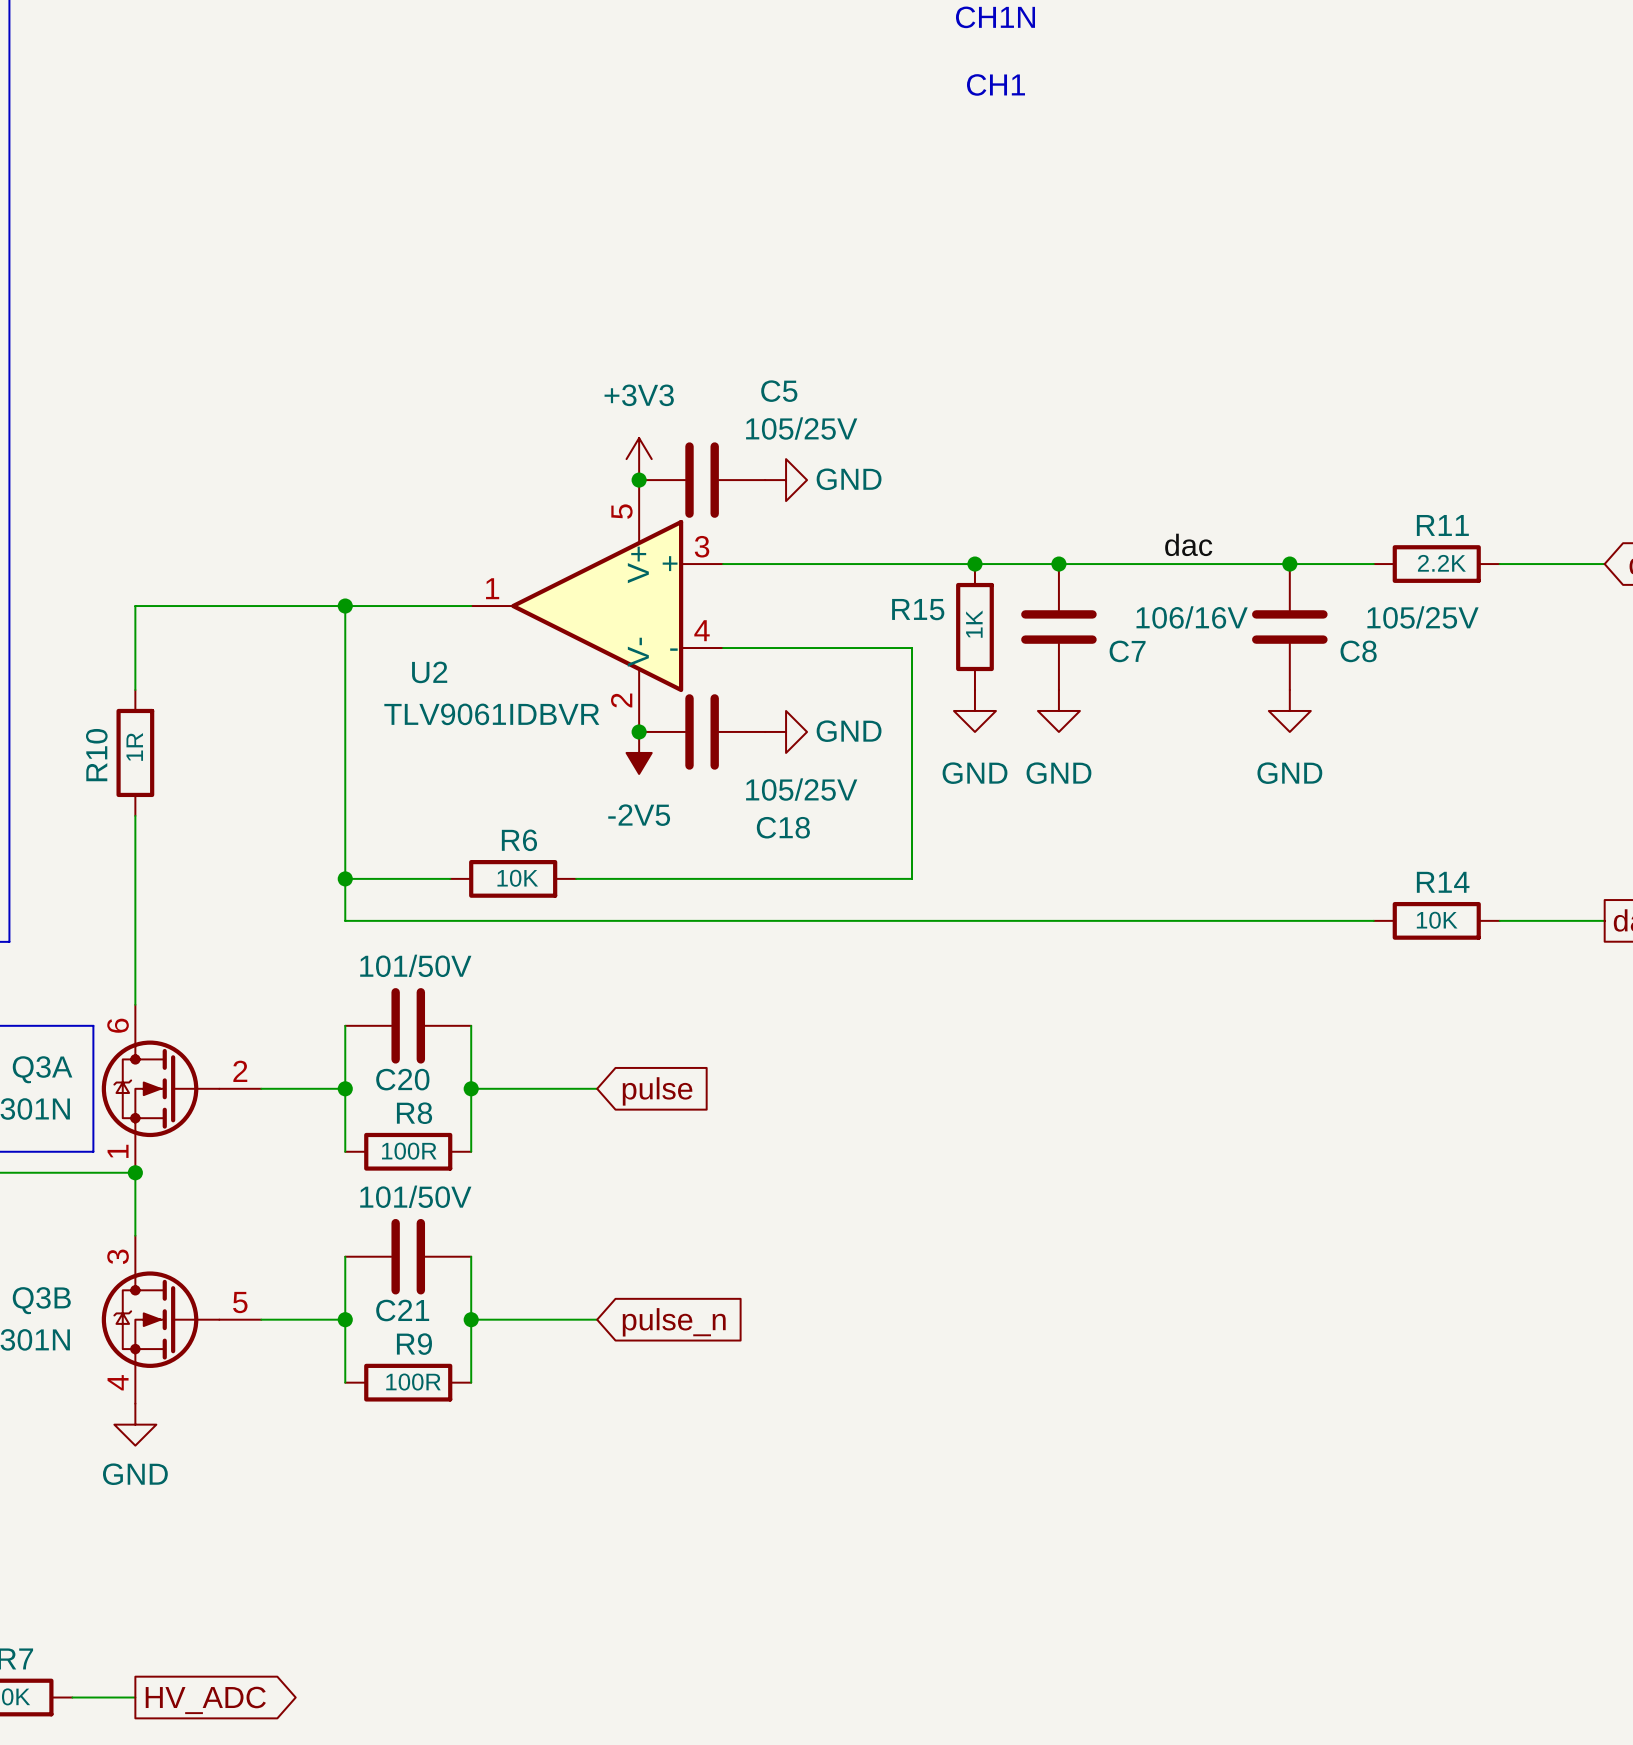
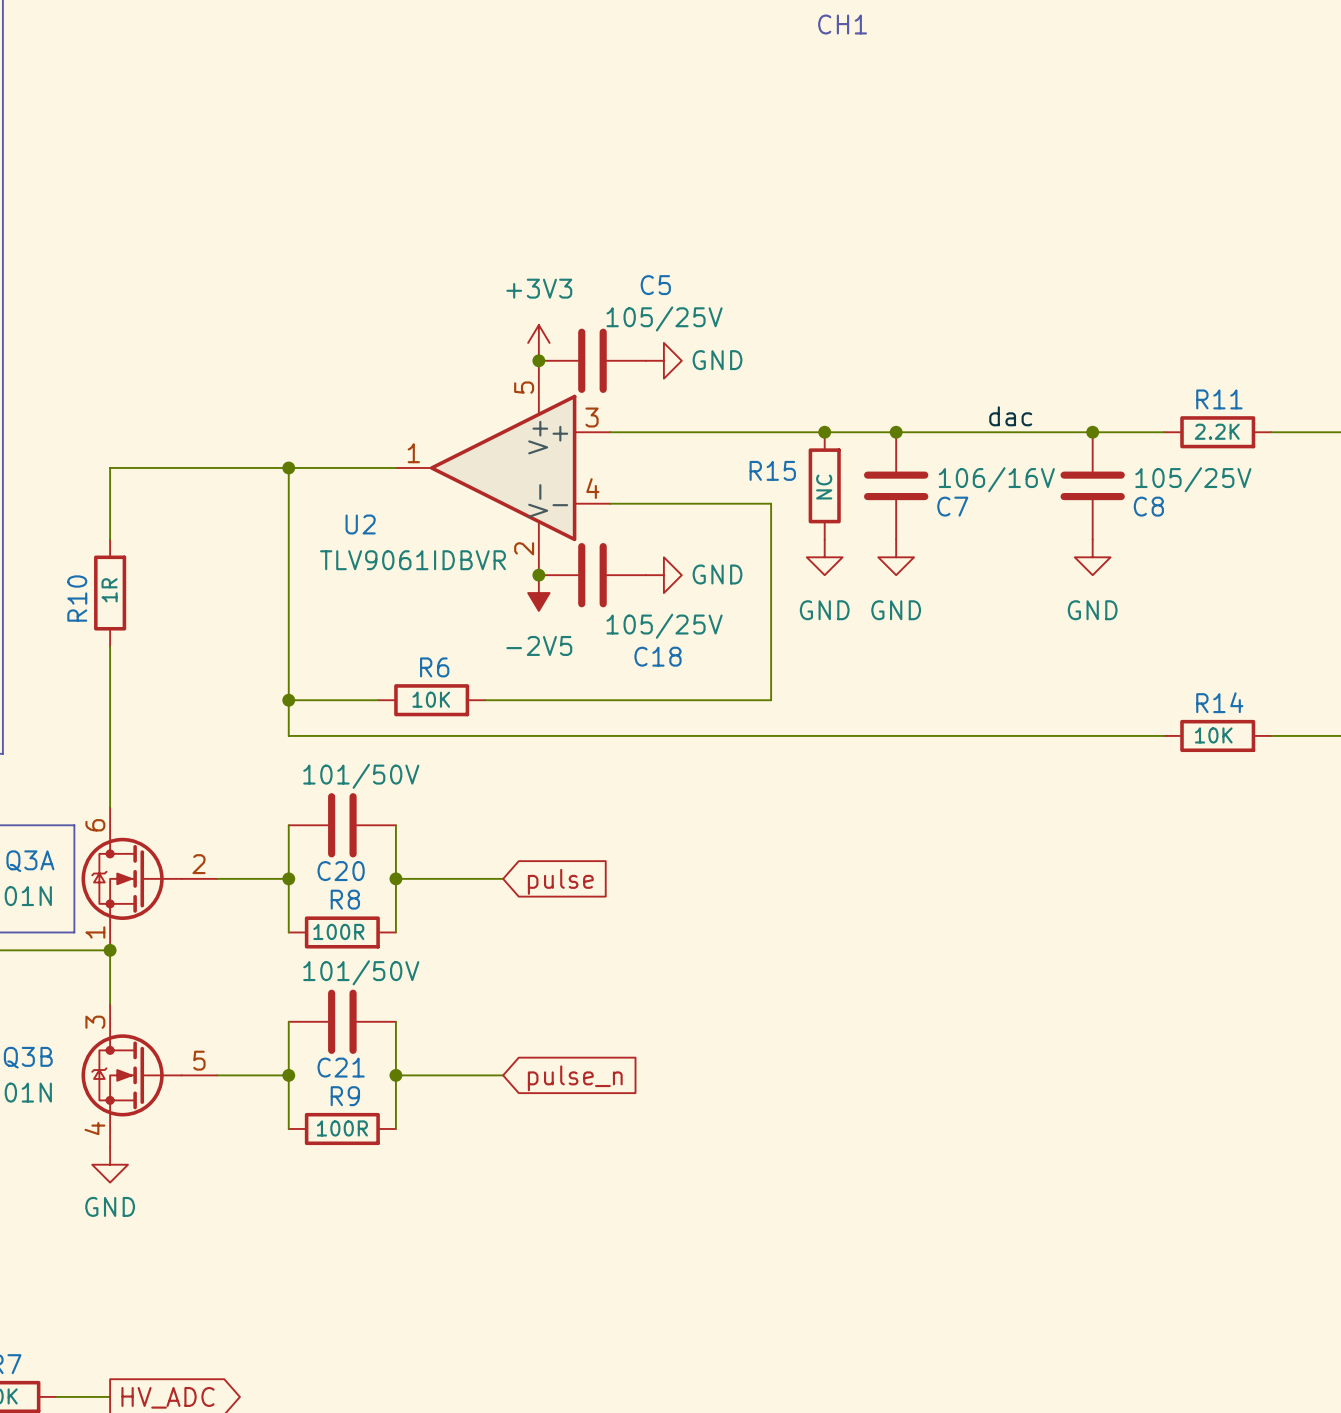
R15 value: 1K (974, 624) -> NC (824, 487)

